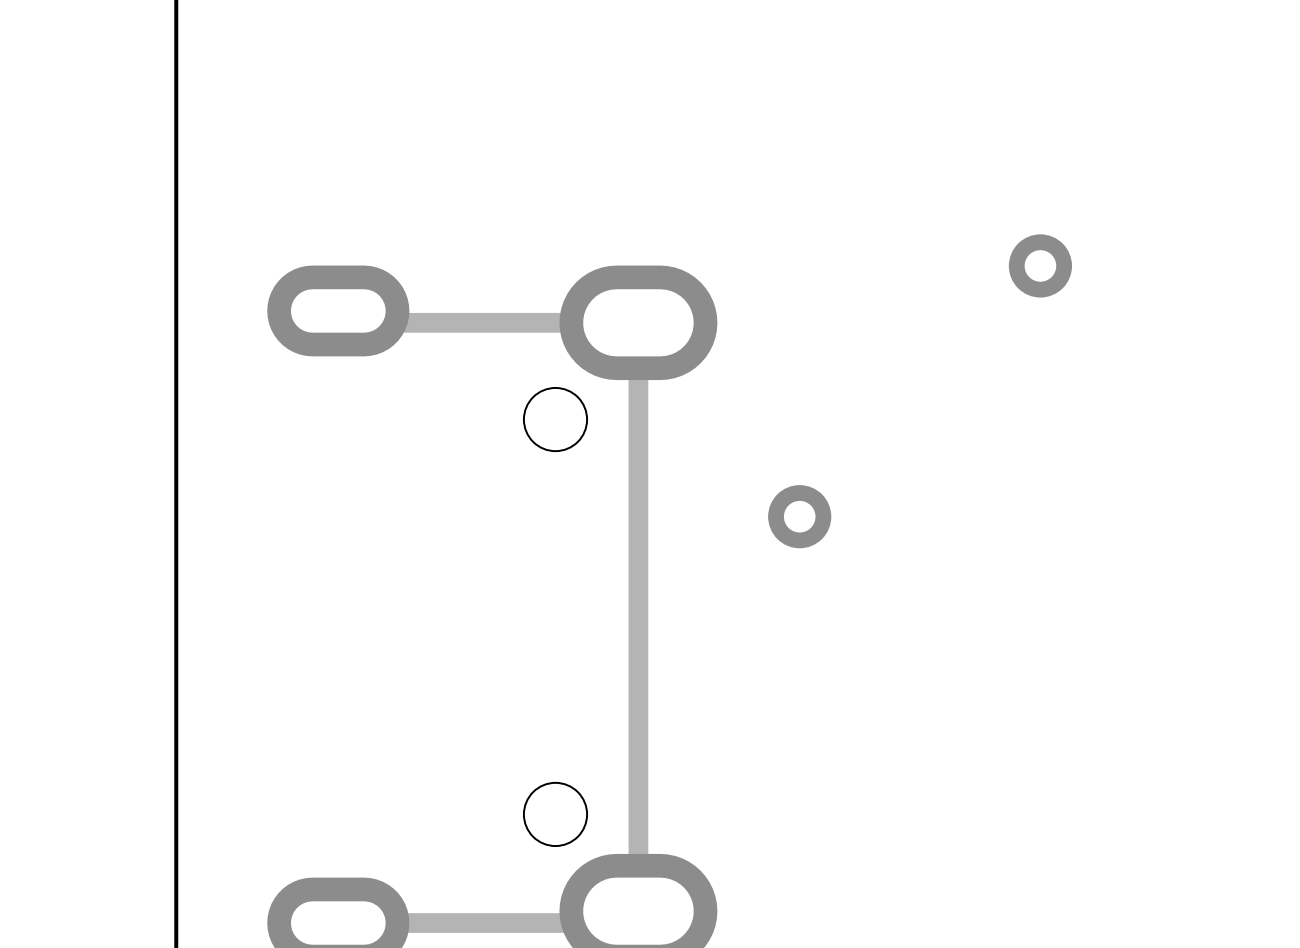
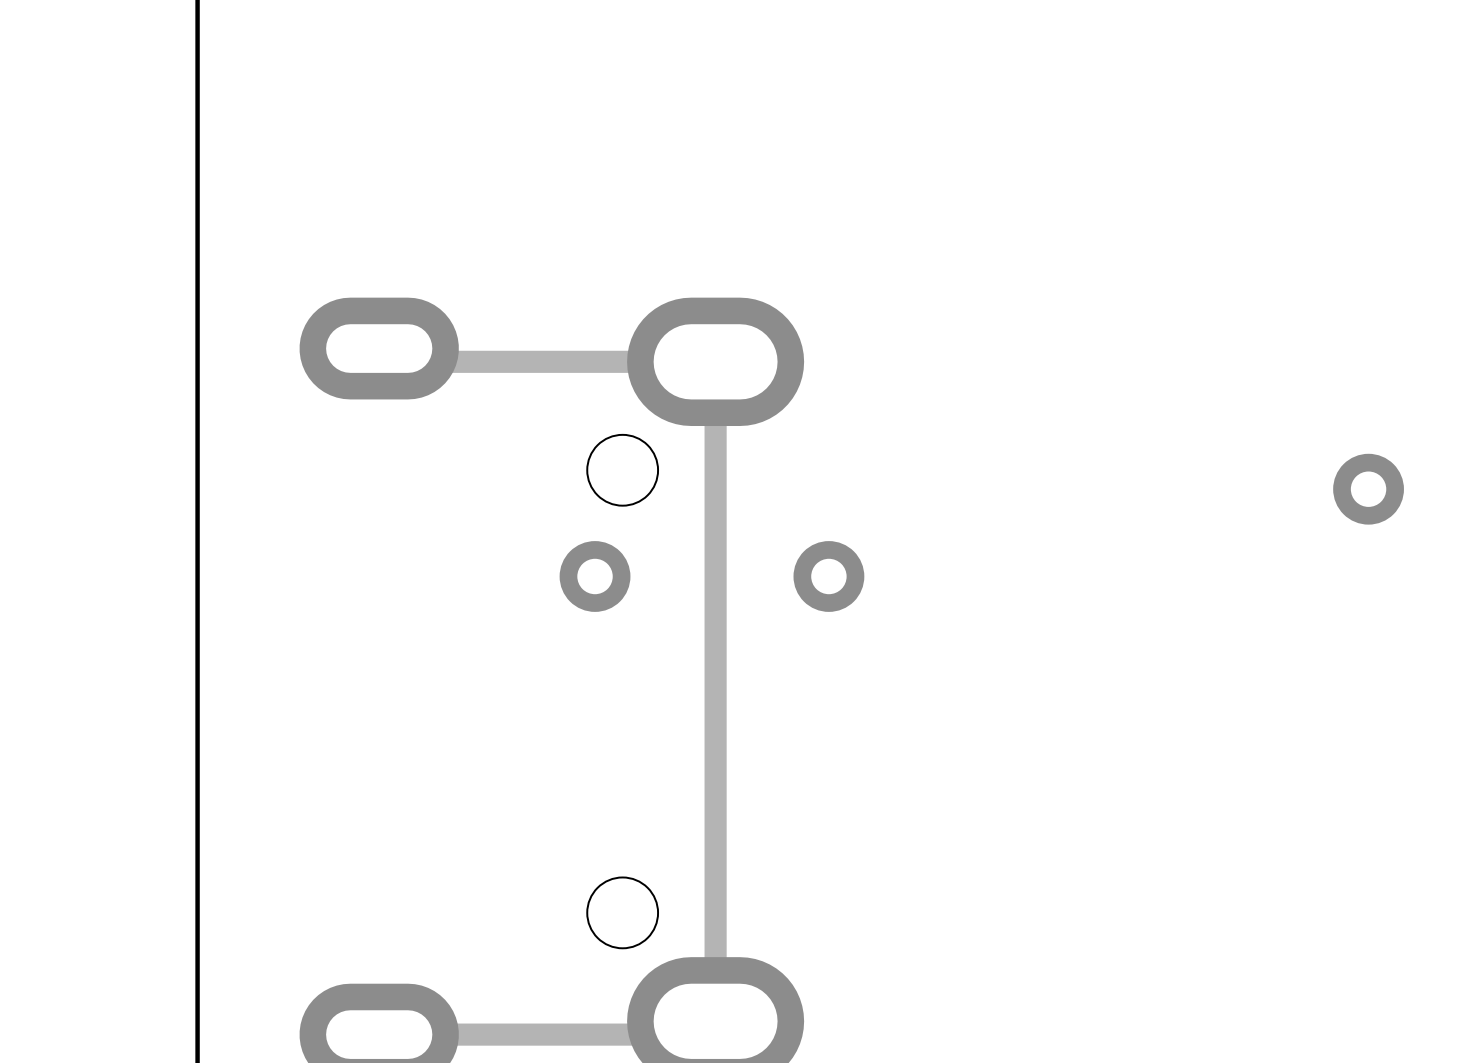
via: (1040, 265) -> none
via: none -> (1368, 489)
via: none -> (595, 576)
via position: (799, 516) -> (828, 576)

